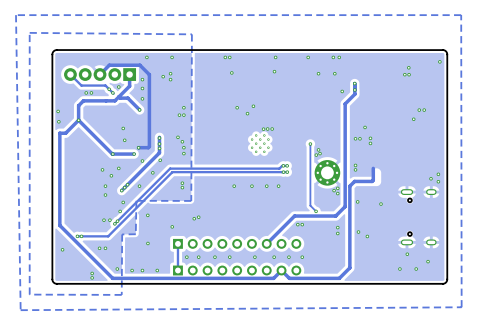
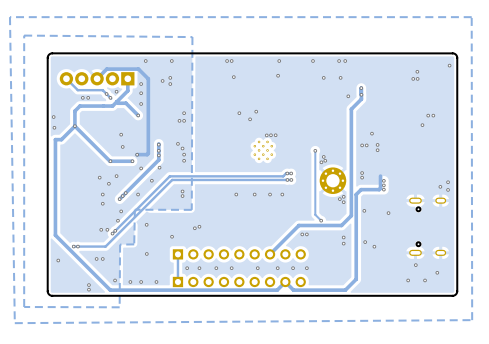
via: none -> (383, 180)
via: none -> (383, 185)
via: none -> (383, 189)

